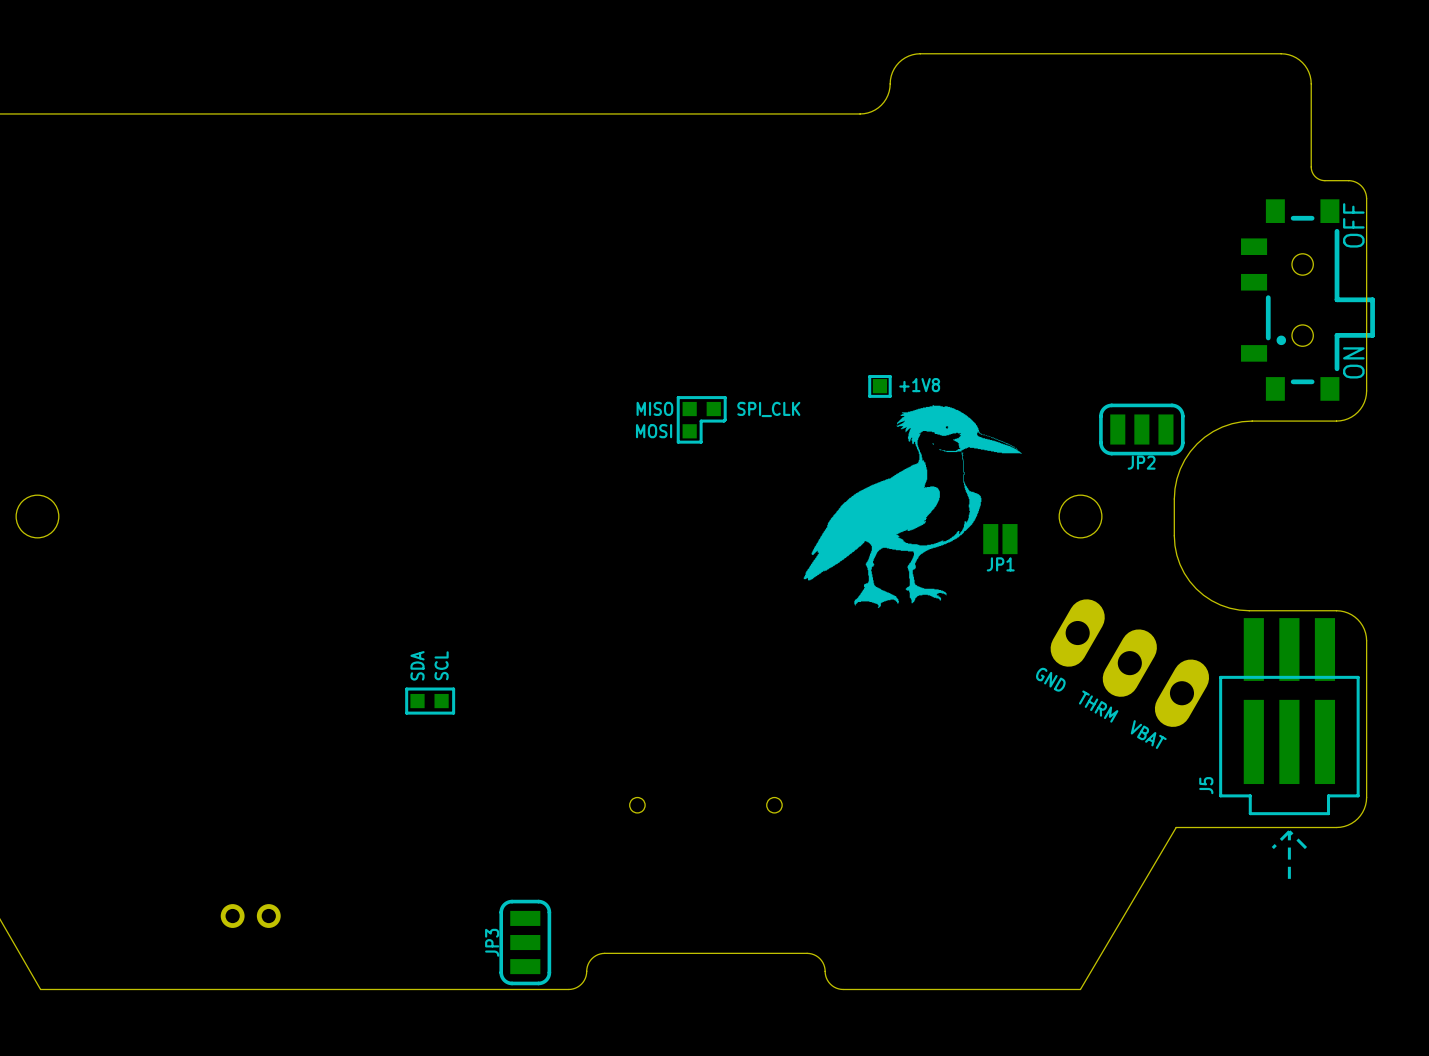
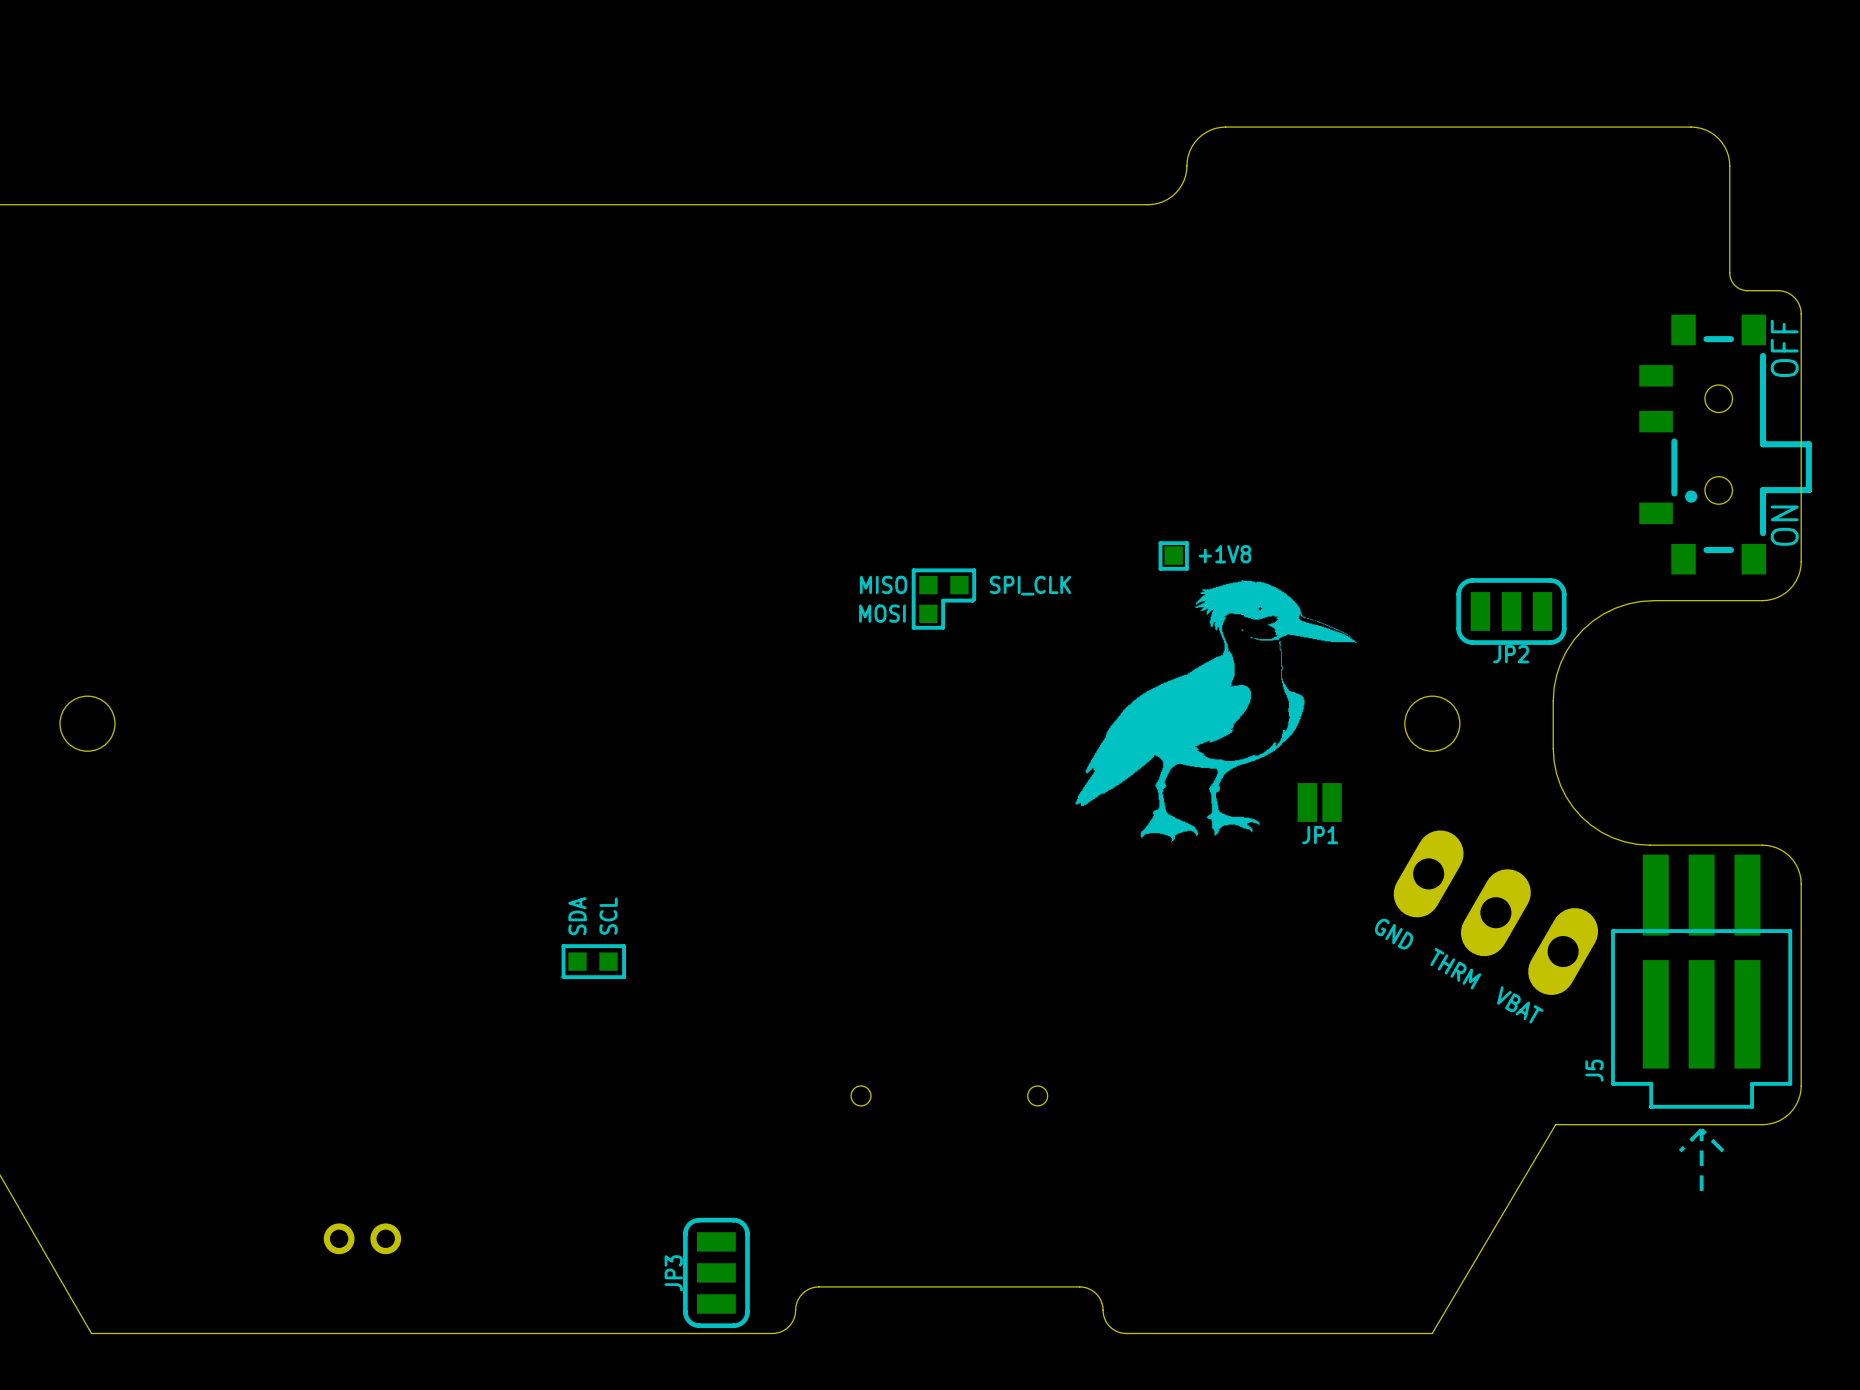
JP1 position: (1000, 539) -> (1319, 802)

